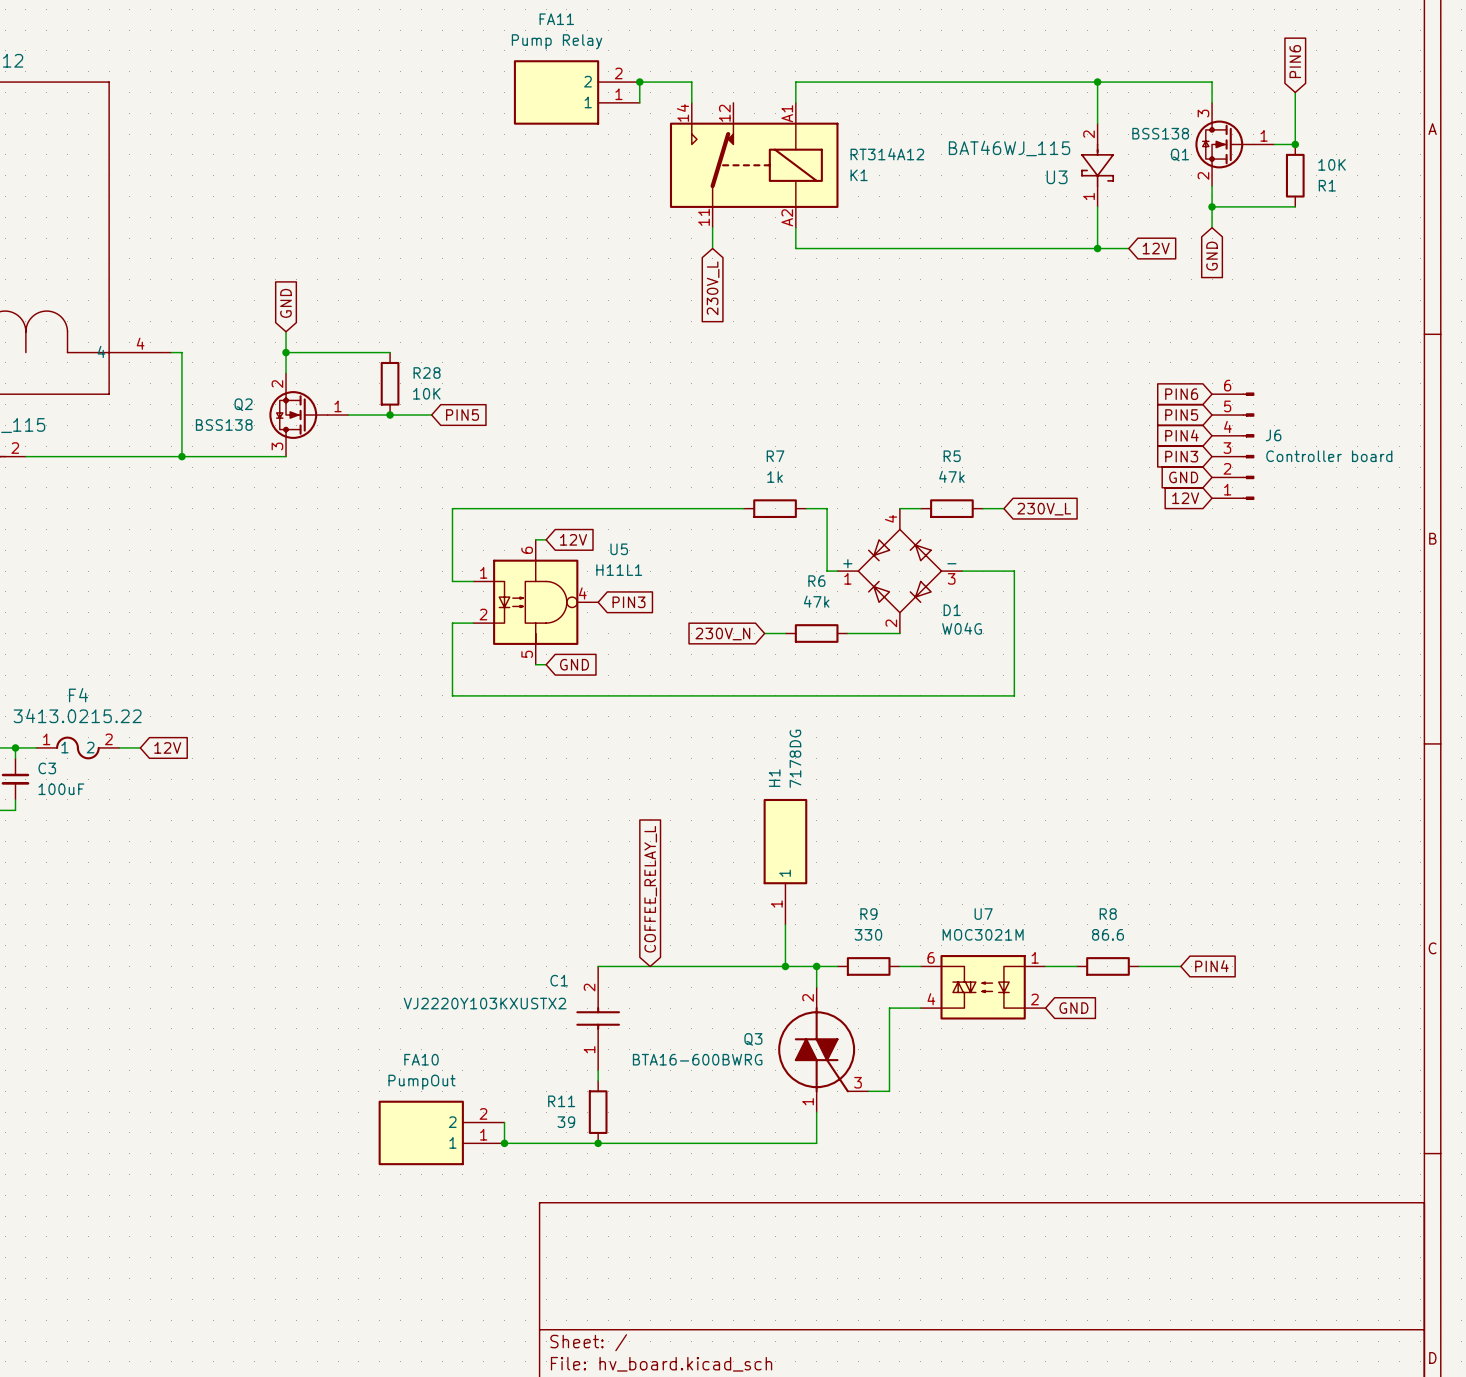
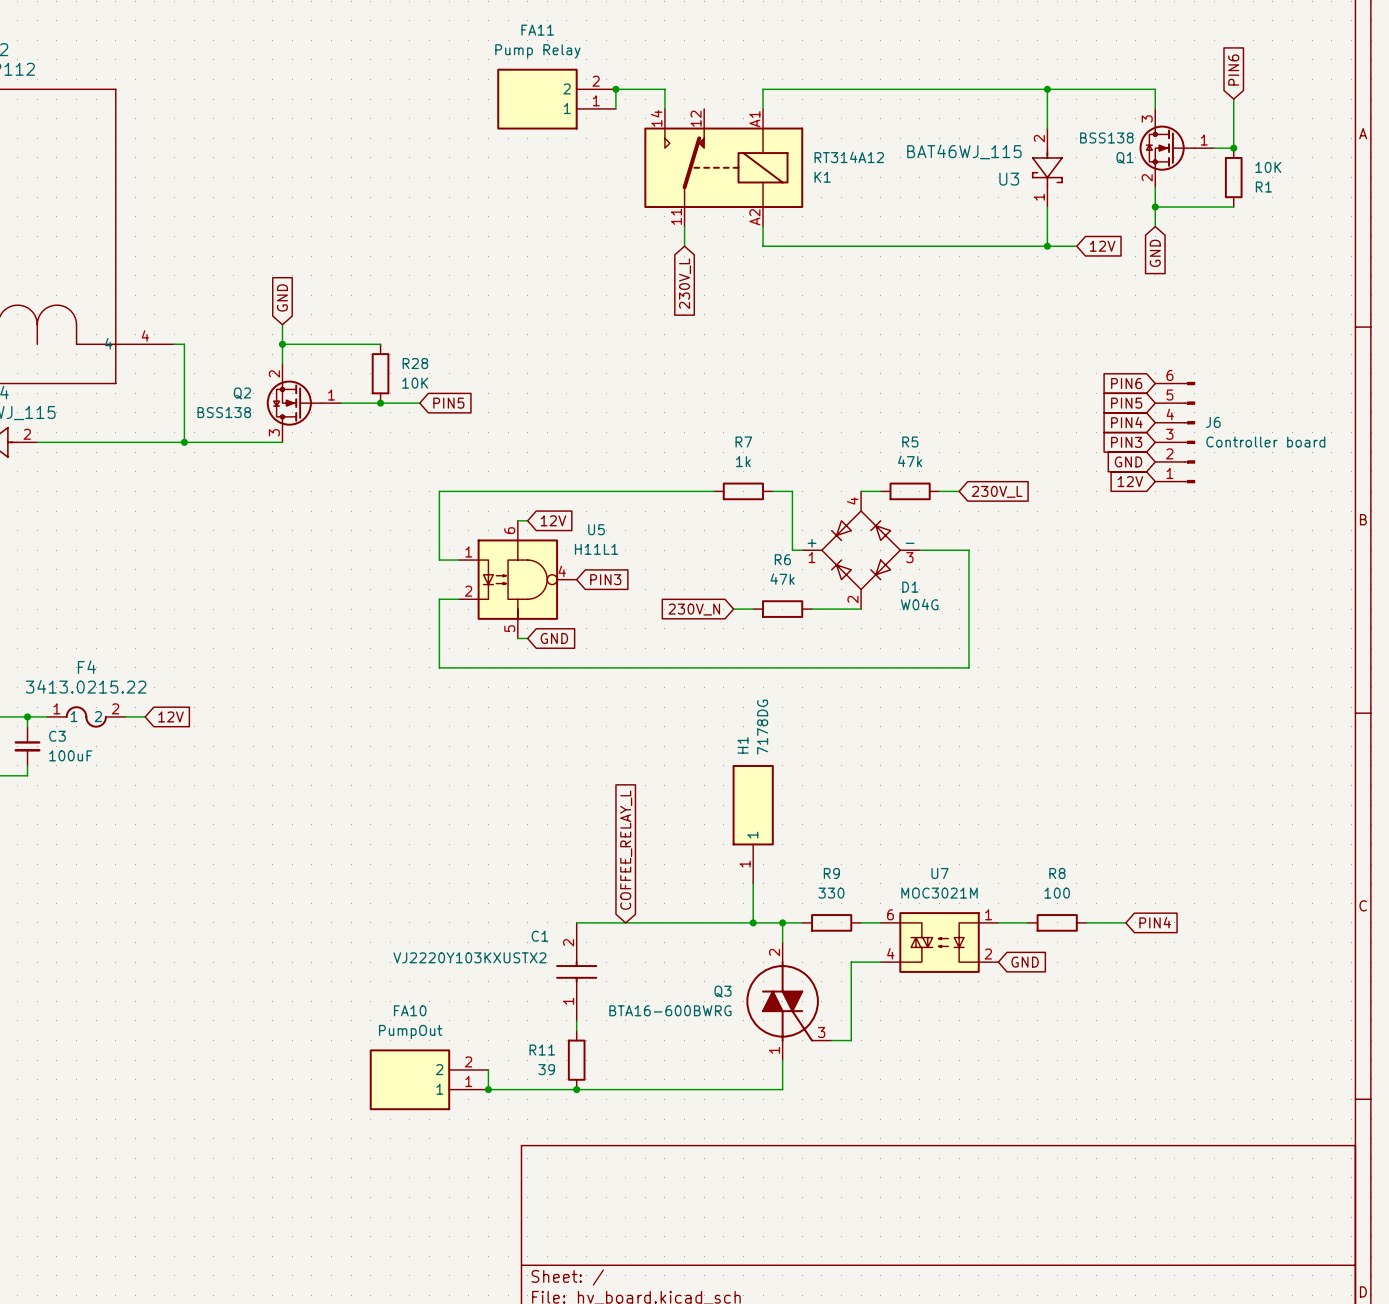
R8 value: 86.6 (1107, 934) -> 100 (1057, 893)

